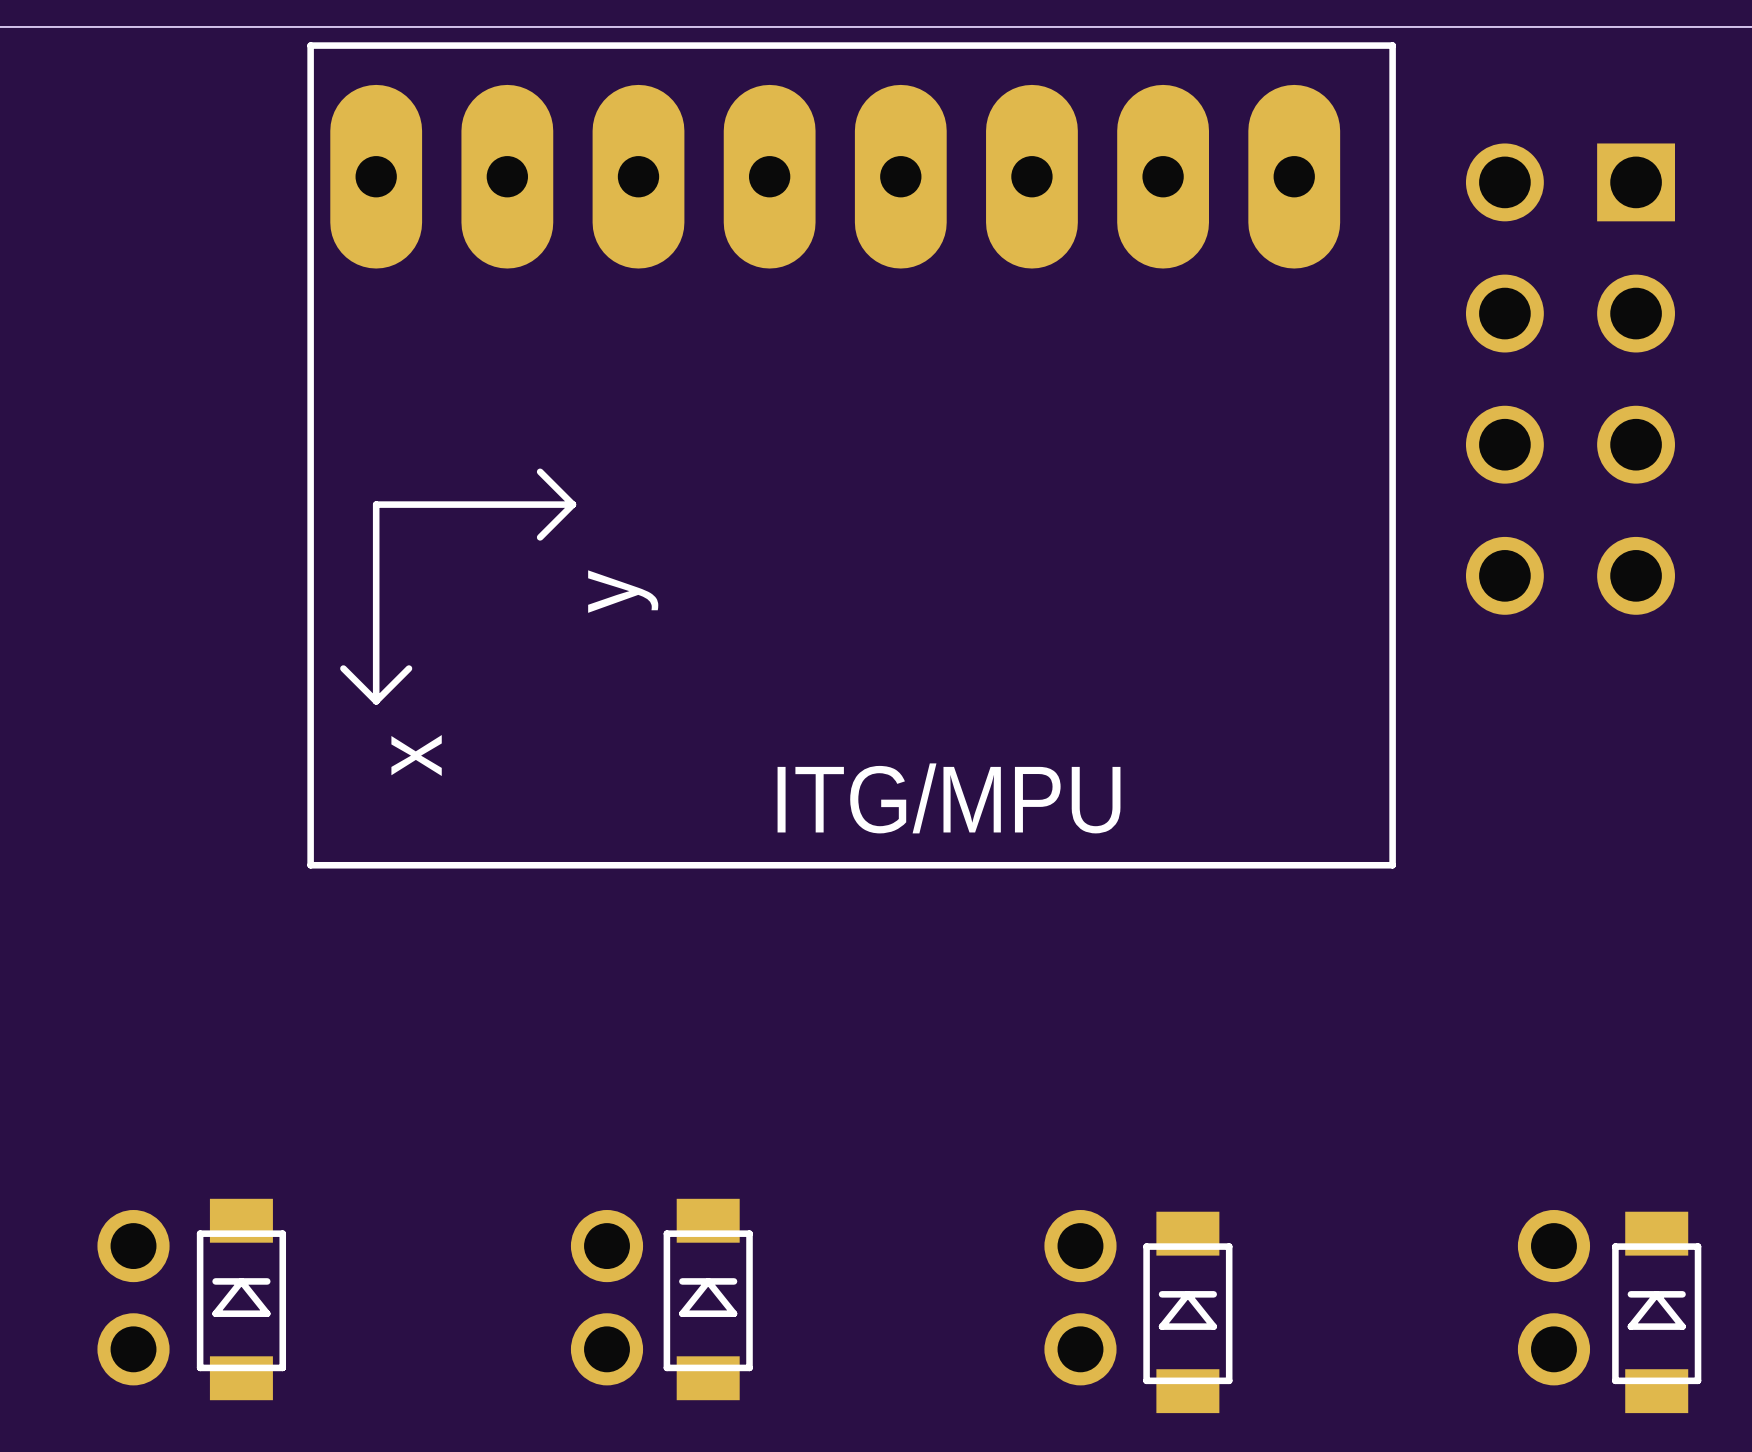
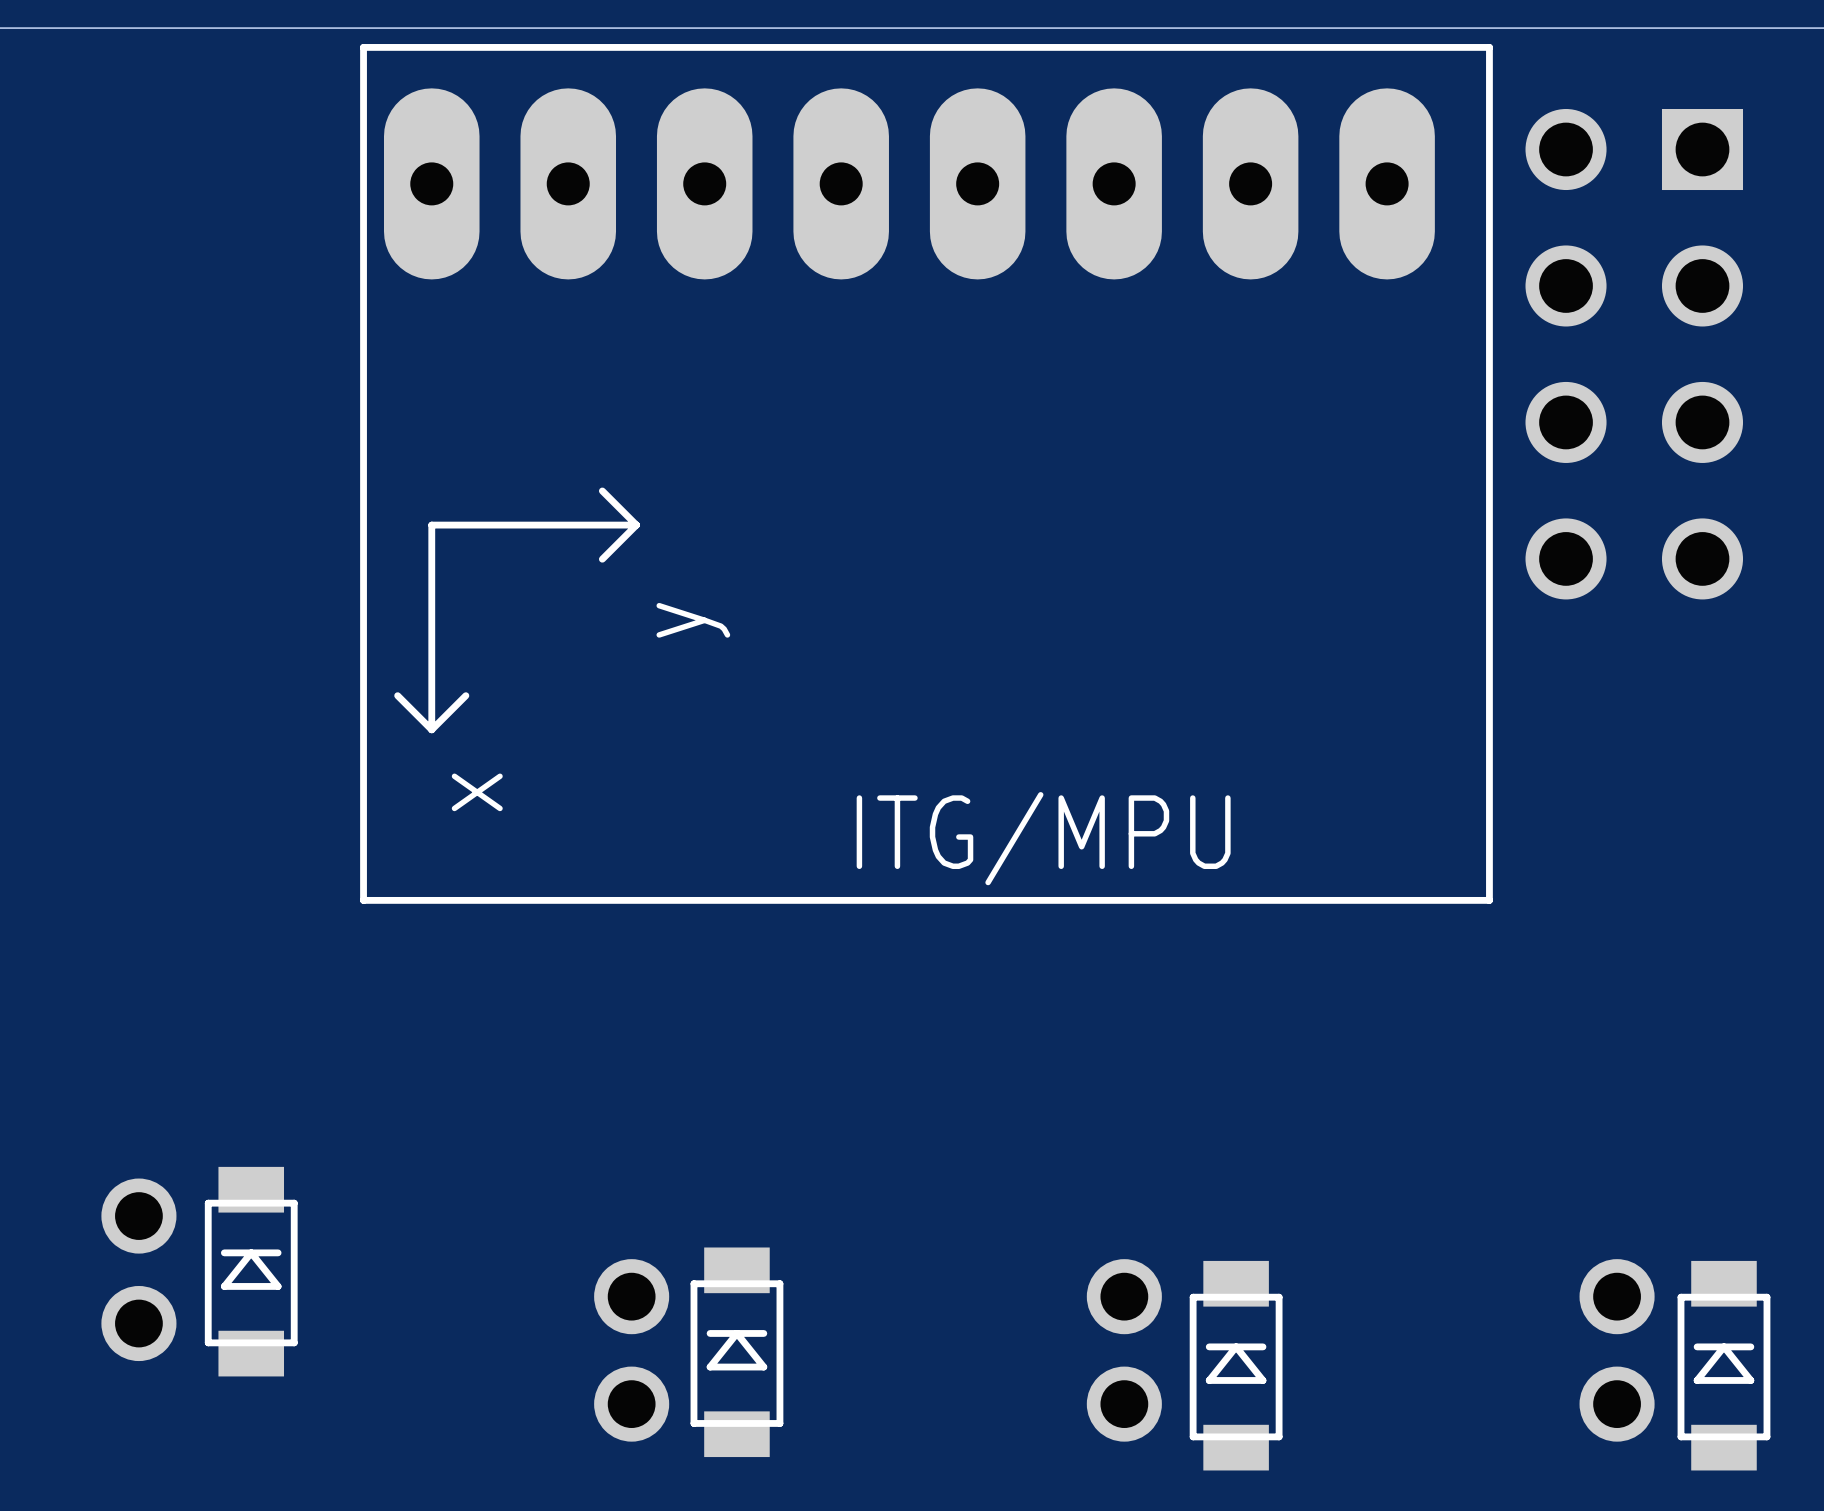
part position: (1570, 379) -> (1634, 354)
part position: (851, 455) -> (926, 473)
part position: (133, 1297) -> (138, 1269)
part position: (241, 1299) -> (251, 1271)

